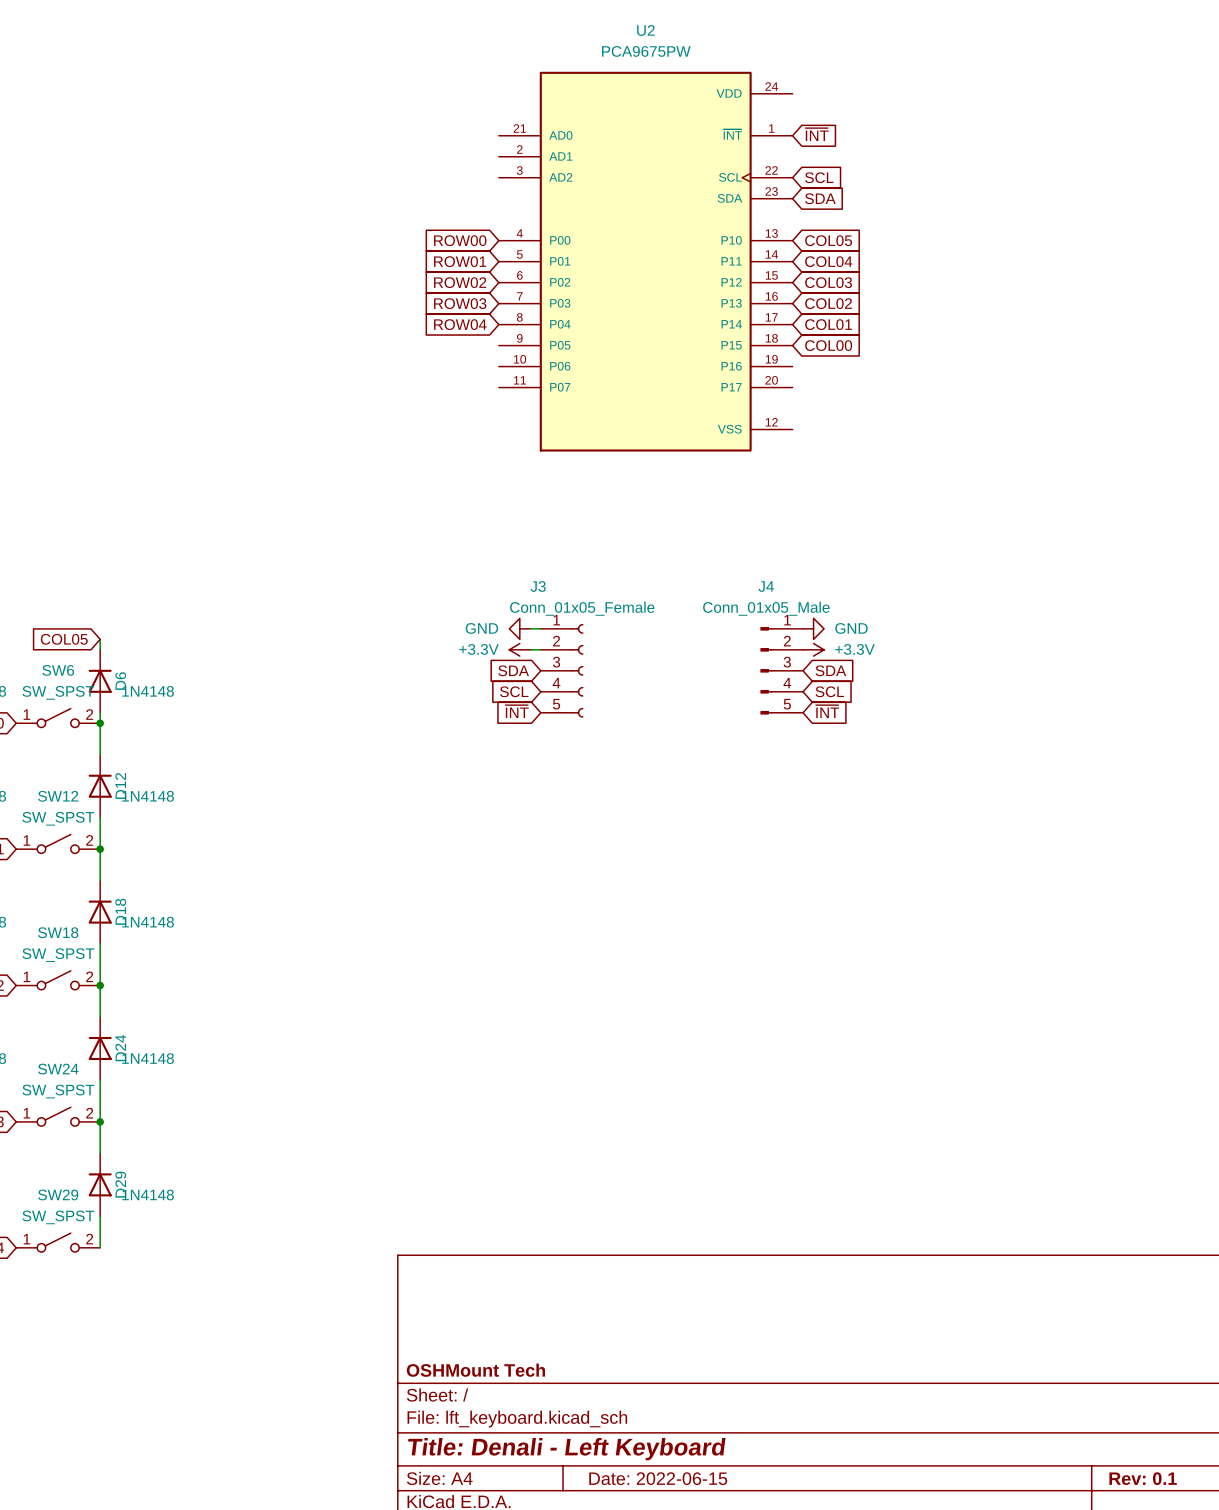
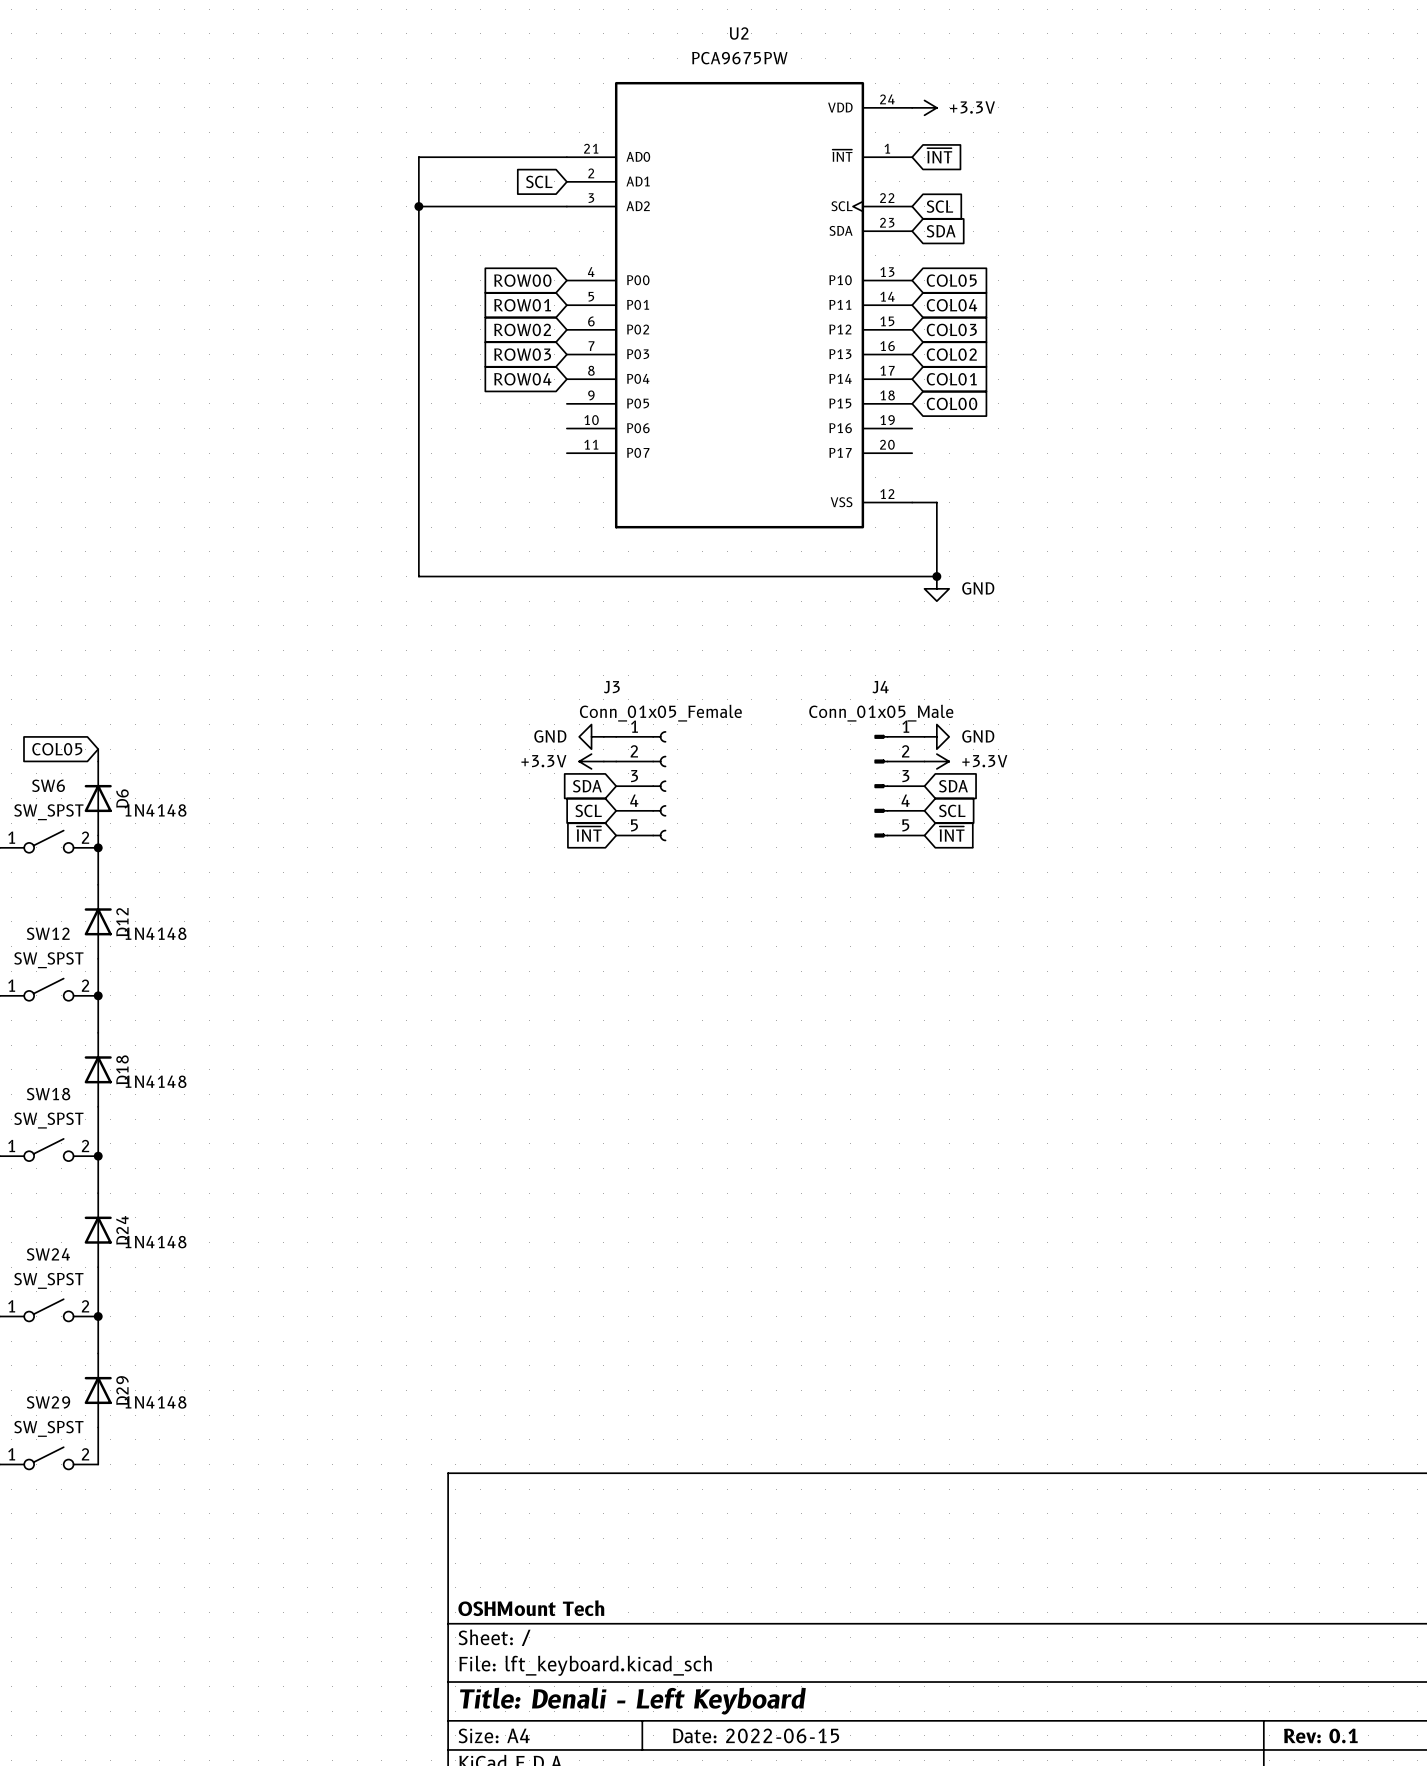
power symbol: none -> +3.3V (924, 107)
wire: none -> (566, 157) (418, 157) (418, 576) (936, 576) (936, 502) (912, 502)
global label: none -> SCL (539, 181)
wire: none -> (418, 206) (566, 206)
junction: none -> (418, 206)
junction: none -> (936, 576)
power symbol: none -> GND (936, 588)

